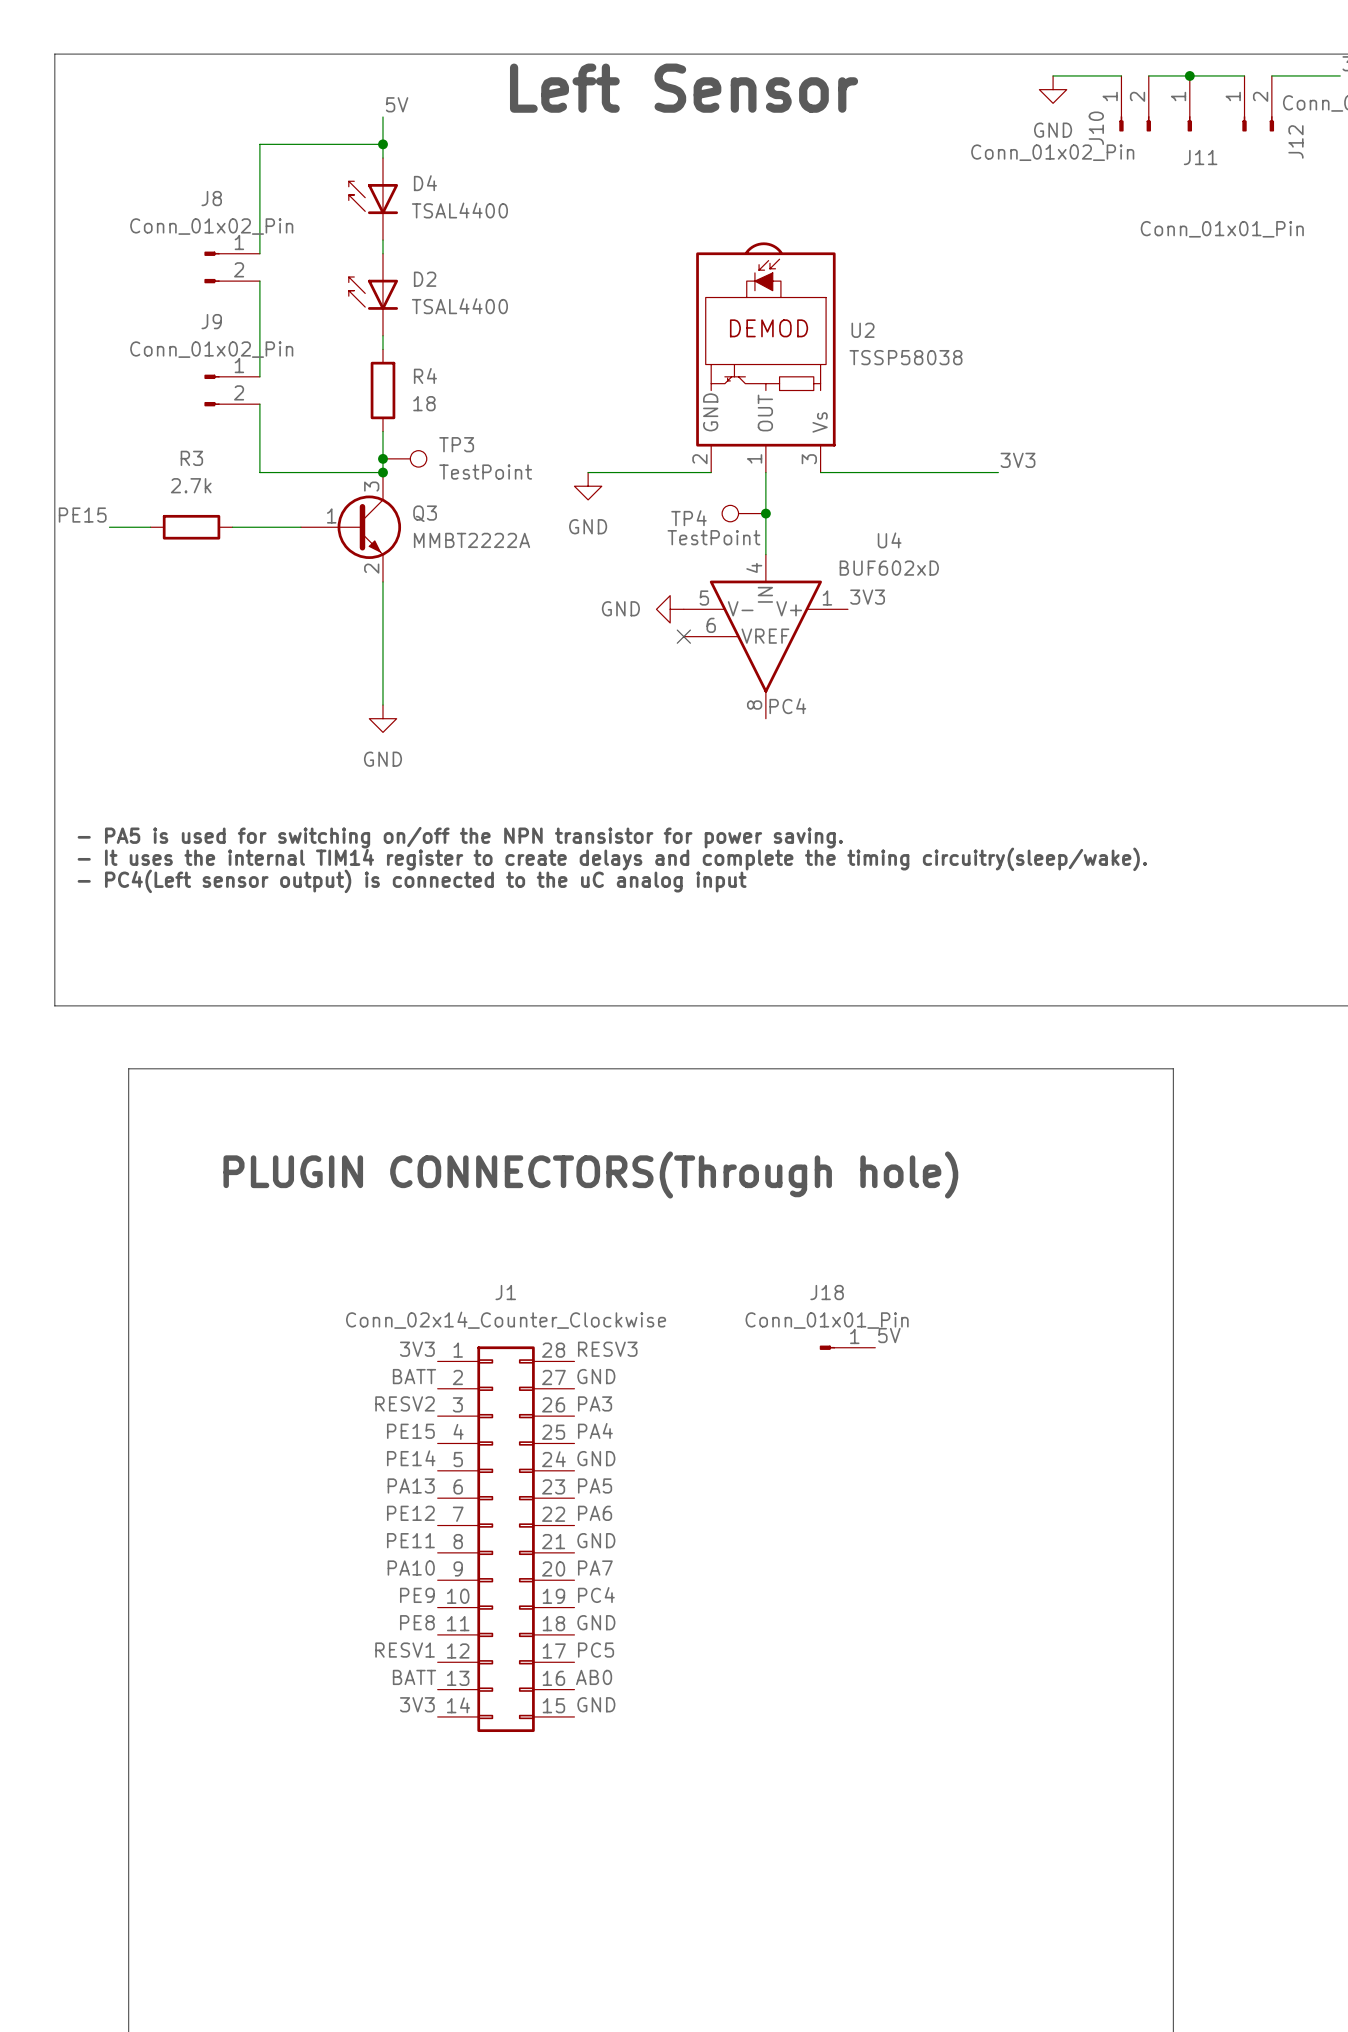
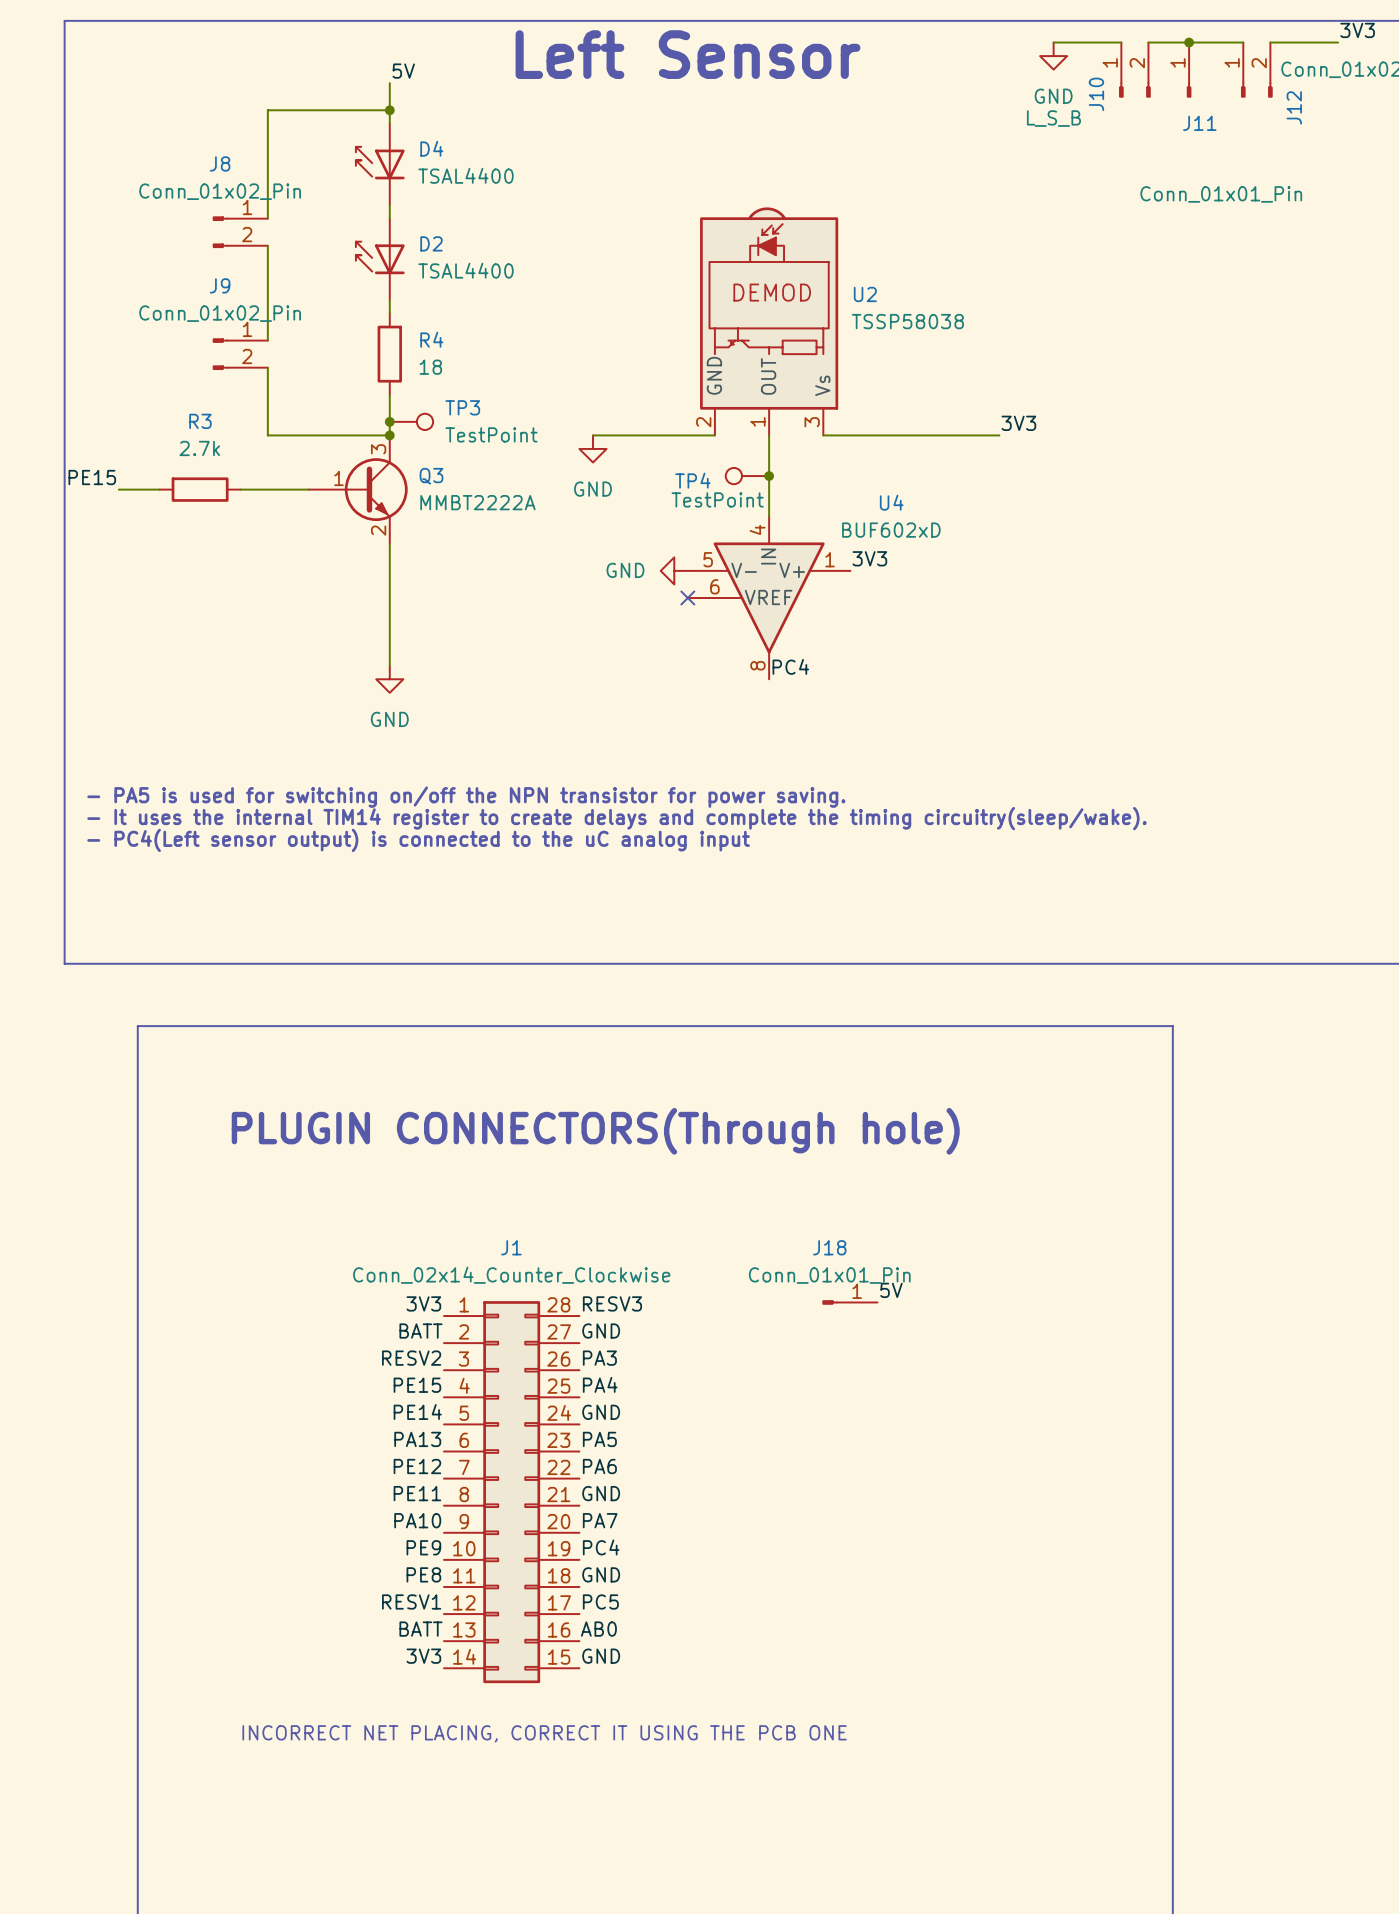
J10 value: Conn_01x02_Pin (1052, 152) -> L_S_B (1053, 118)
text: none -> INCORRECT NET PLACING, CORRECT IT USING THE PCB ONE (544, 1733)

